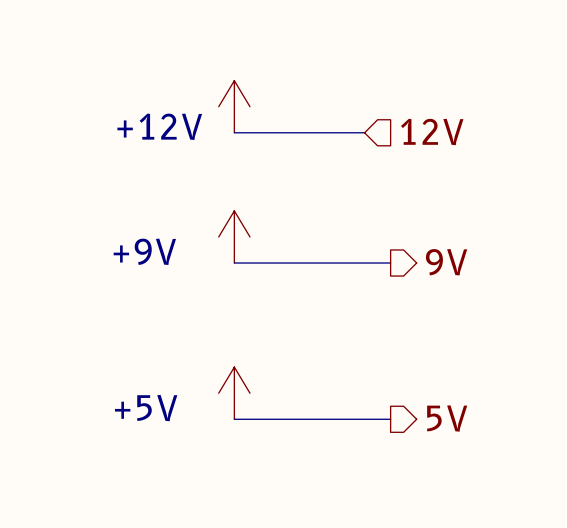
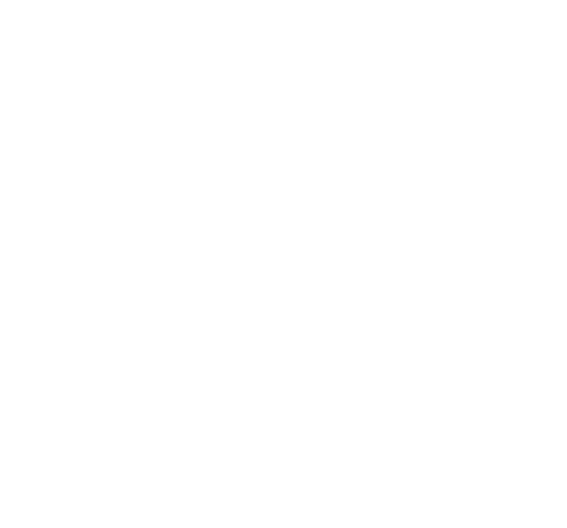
power symbol: +12V (234, 106) -> none
hierarchical label: 12V (432, 131) -> none
wire: (234, 132) (364, 132) -> none
power symbol: +9V (234, 236) -> none
hierarchical label: 9V (446, 262) -> none
wire: (234, 263) (390, 263) -> none
power symbol: +5V (234, 393) -> none
hierarchical label: 5V (447, 418) -> none
wire: (234, 419) (390, 419) -> none

